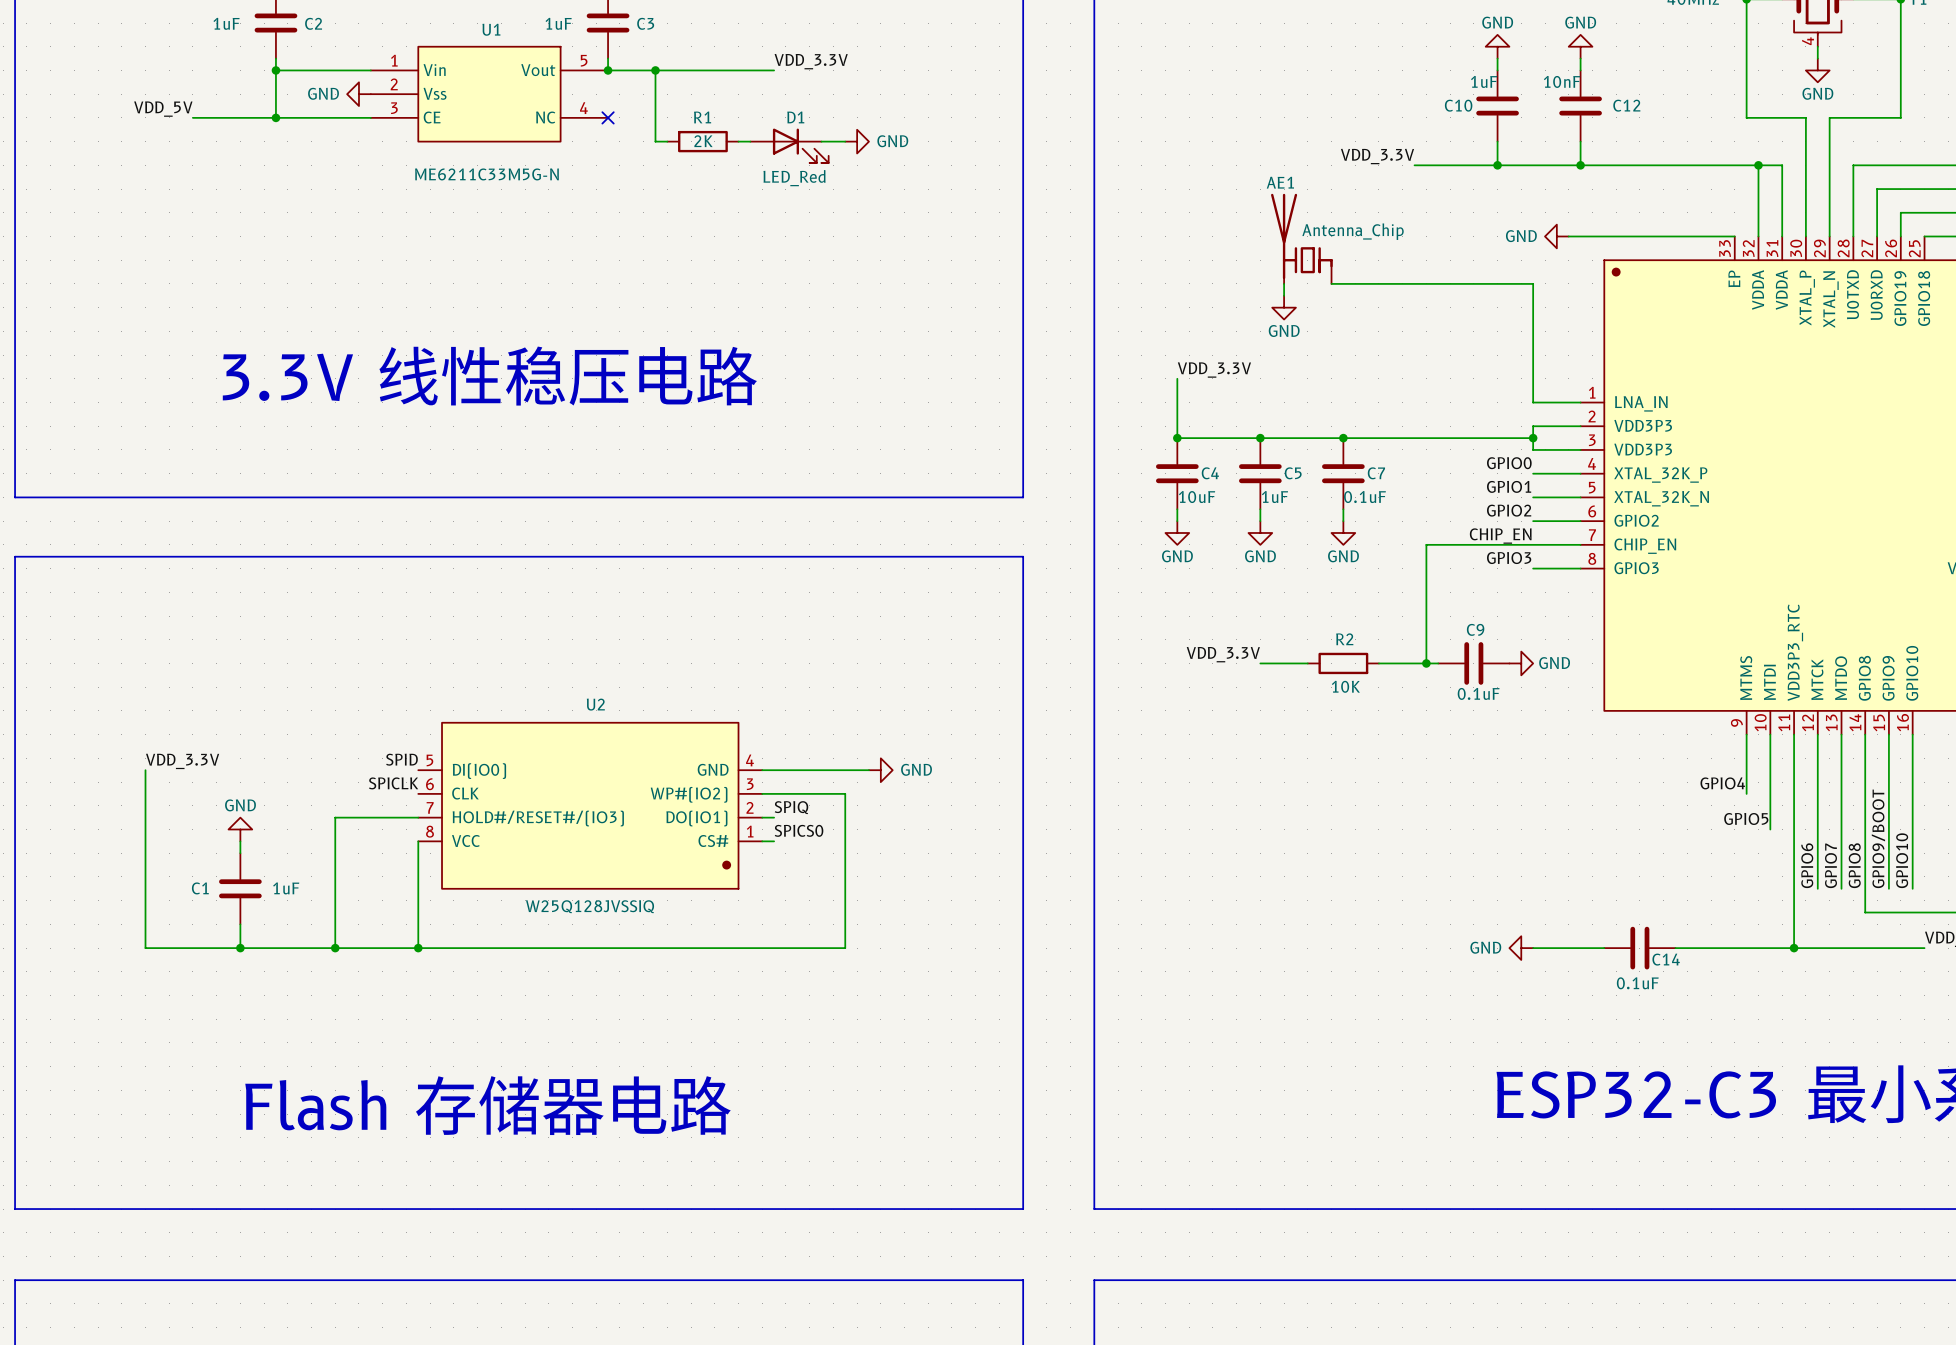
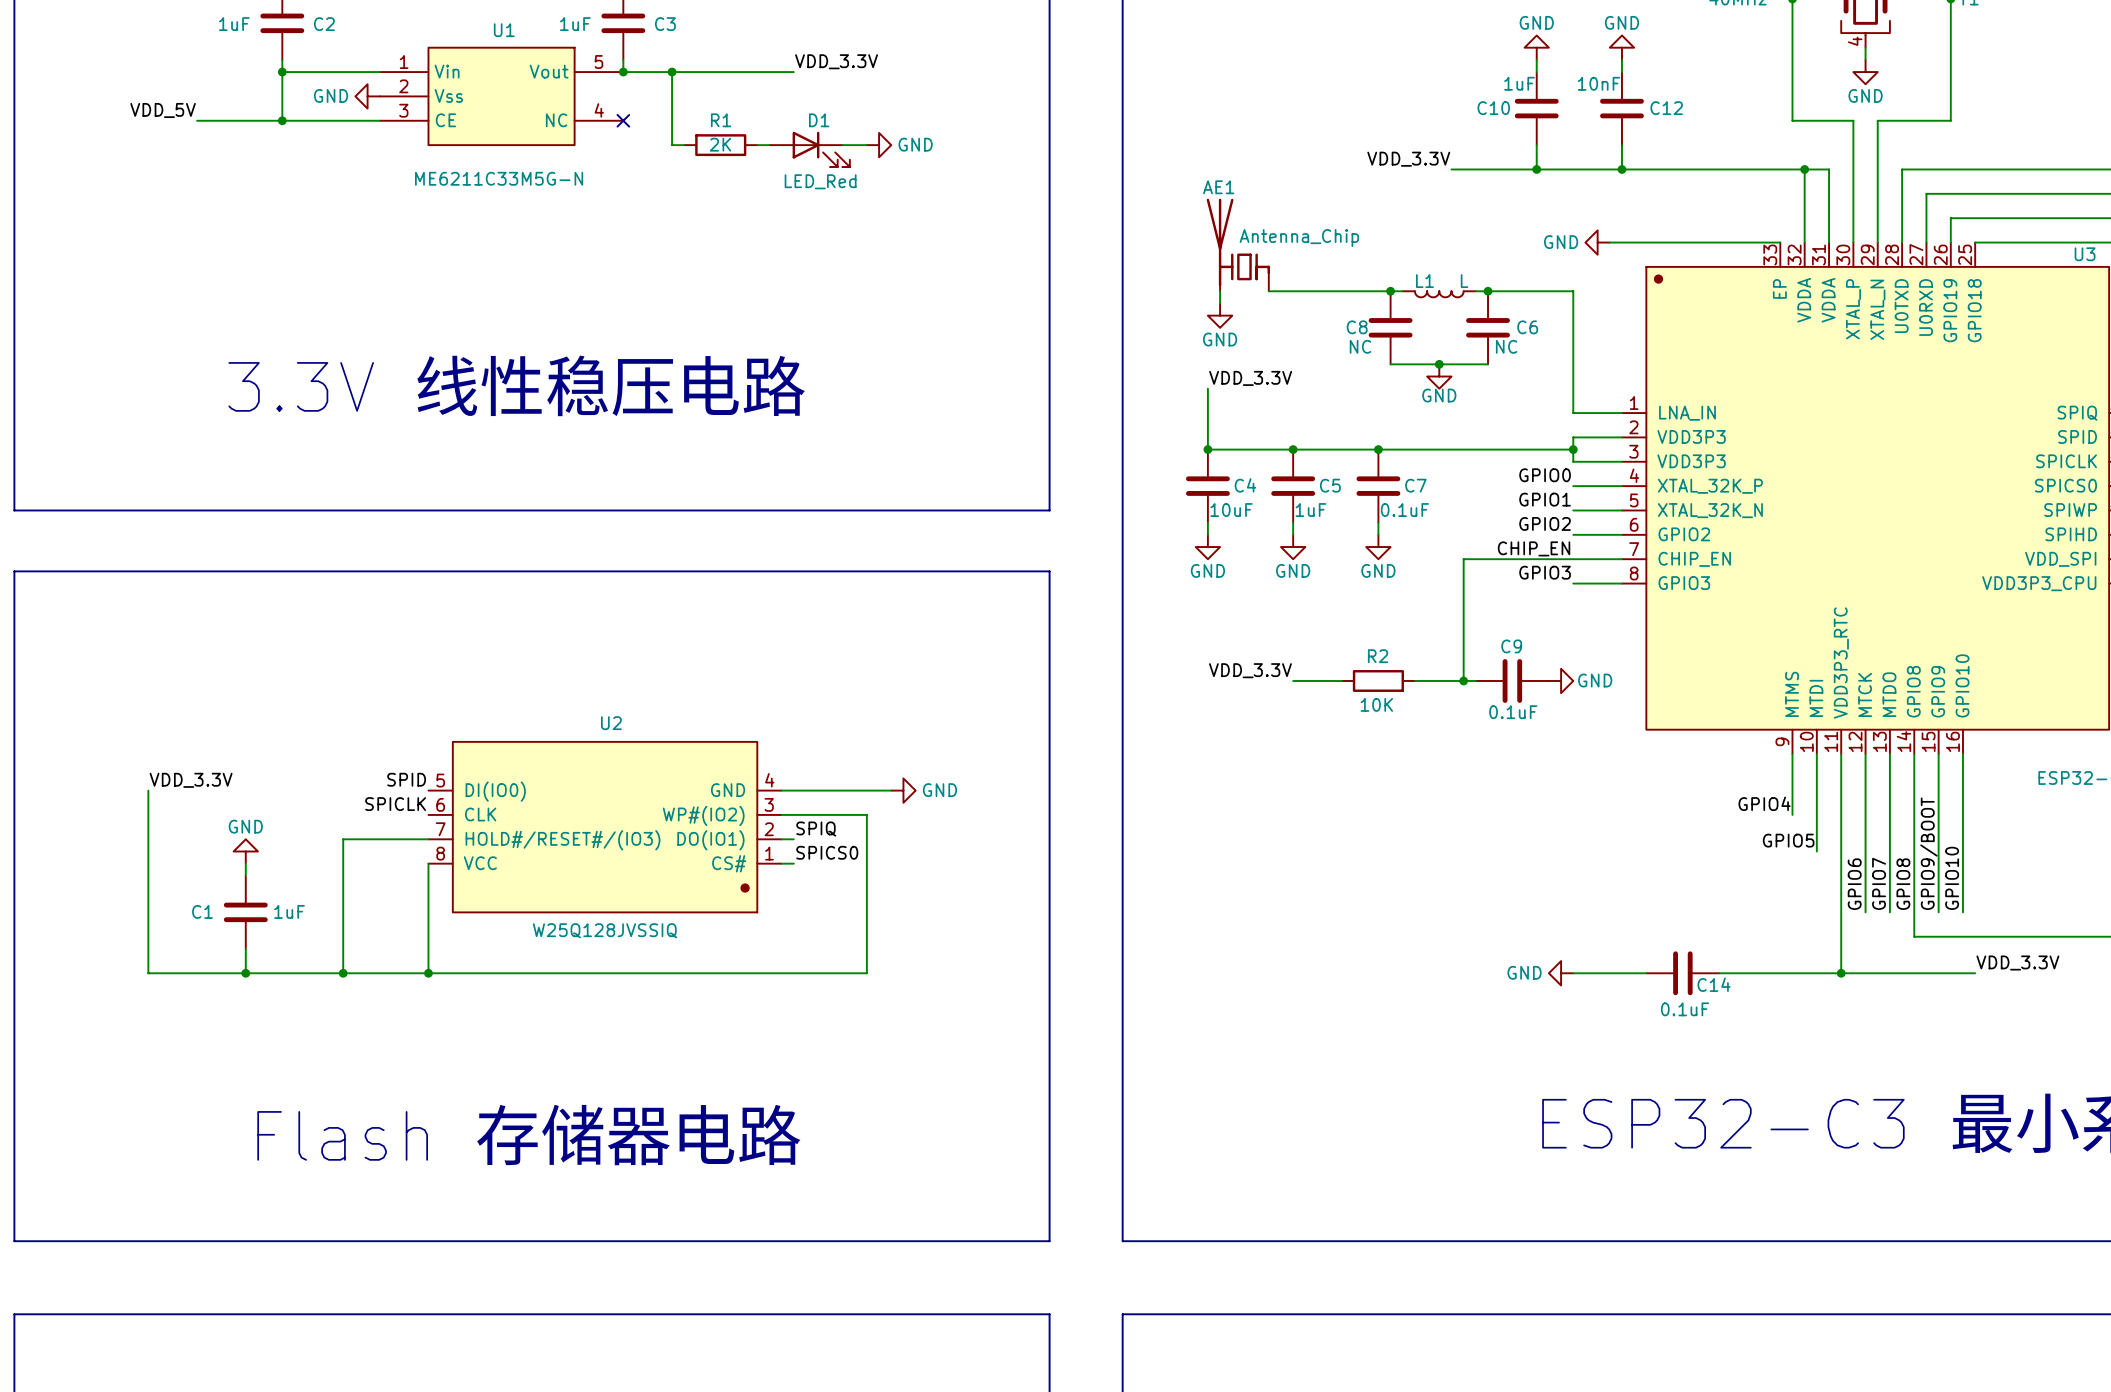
AE1 position: (1301, 238) -> (1238, 244)
wire: none -> (1268, 291) (1366, 291)
wire: (1284, 283) (1284, 295) -> (1220, 291) (1220, 303)
junction: none -> (1390, 291)
wire: (1367, 283) (1438, 283) -> none
junction: none -> (1488, 291)
L1: none -> L (1439, 294)
power symbol: none -> GND (1220, 315)
power symbol: GND (1284, 307) -> none
C8: none -> NC (1390, 327)
C6: none -> NC (1488, 327)
wire: none -> (1390, 364) (1488, 364)
junction: none -> (1439, 364)
power symbol: none -> GND (1439, 376)

